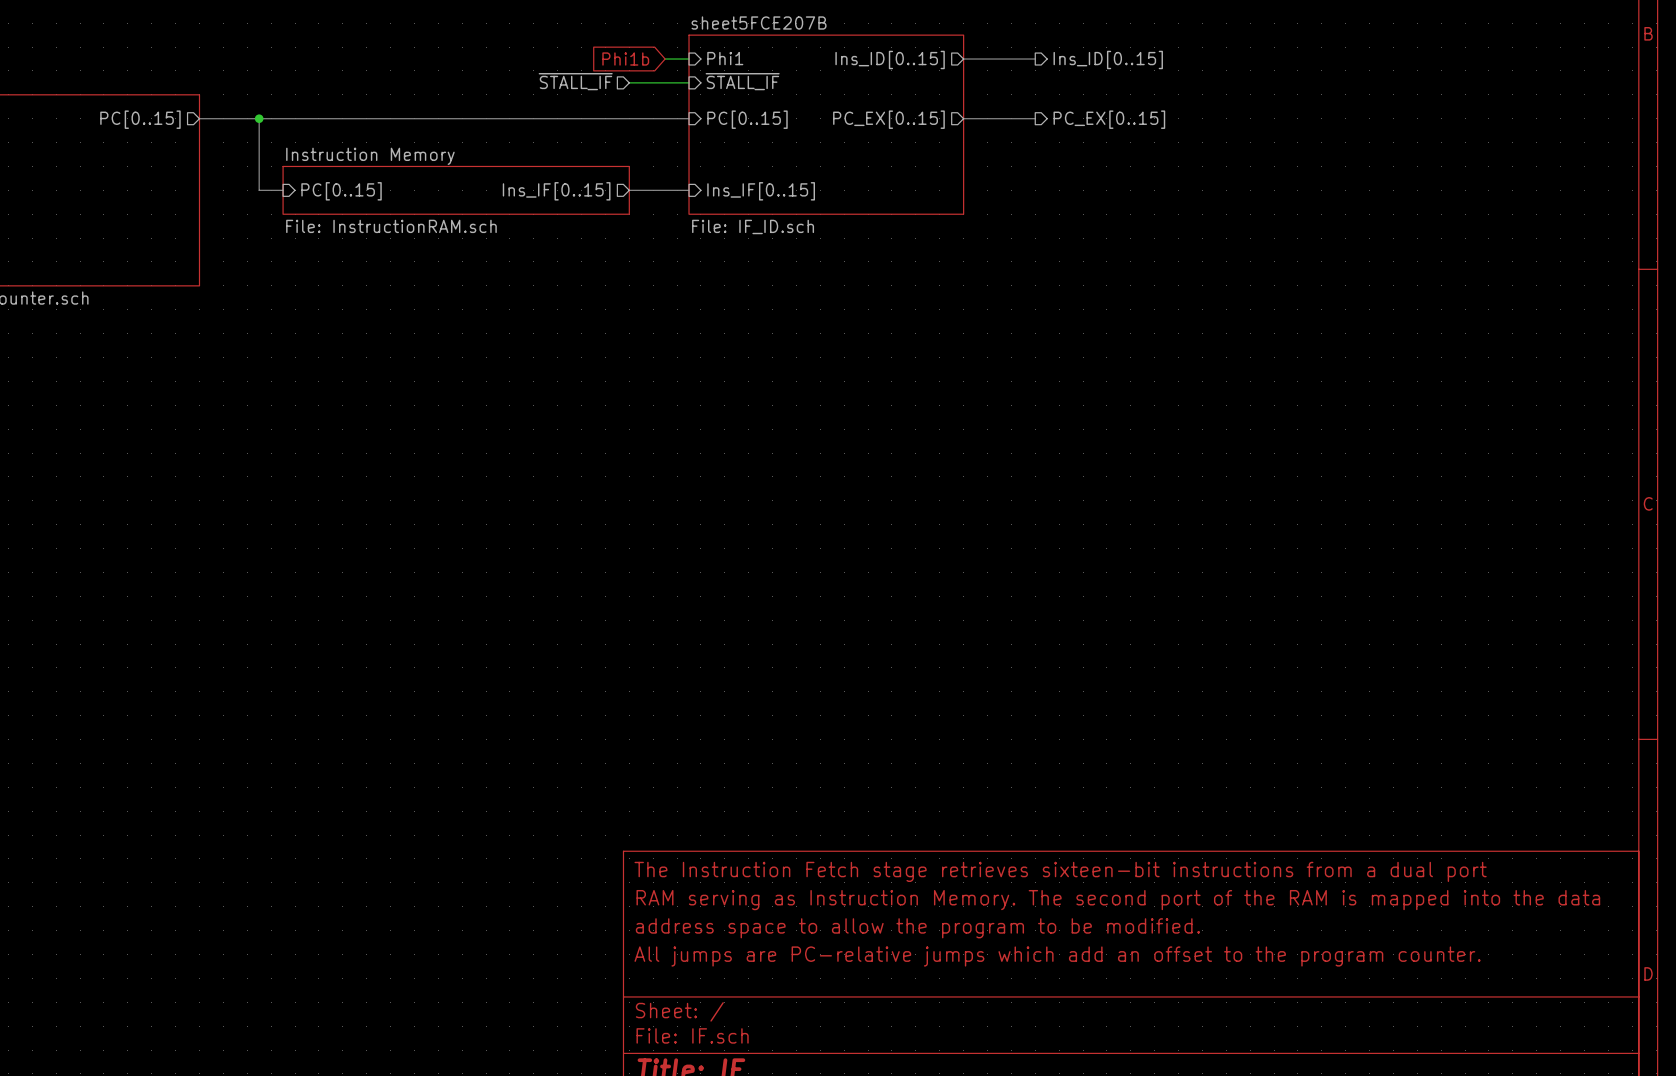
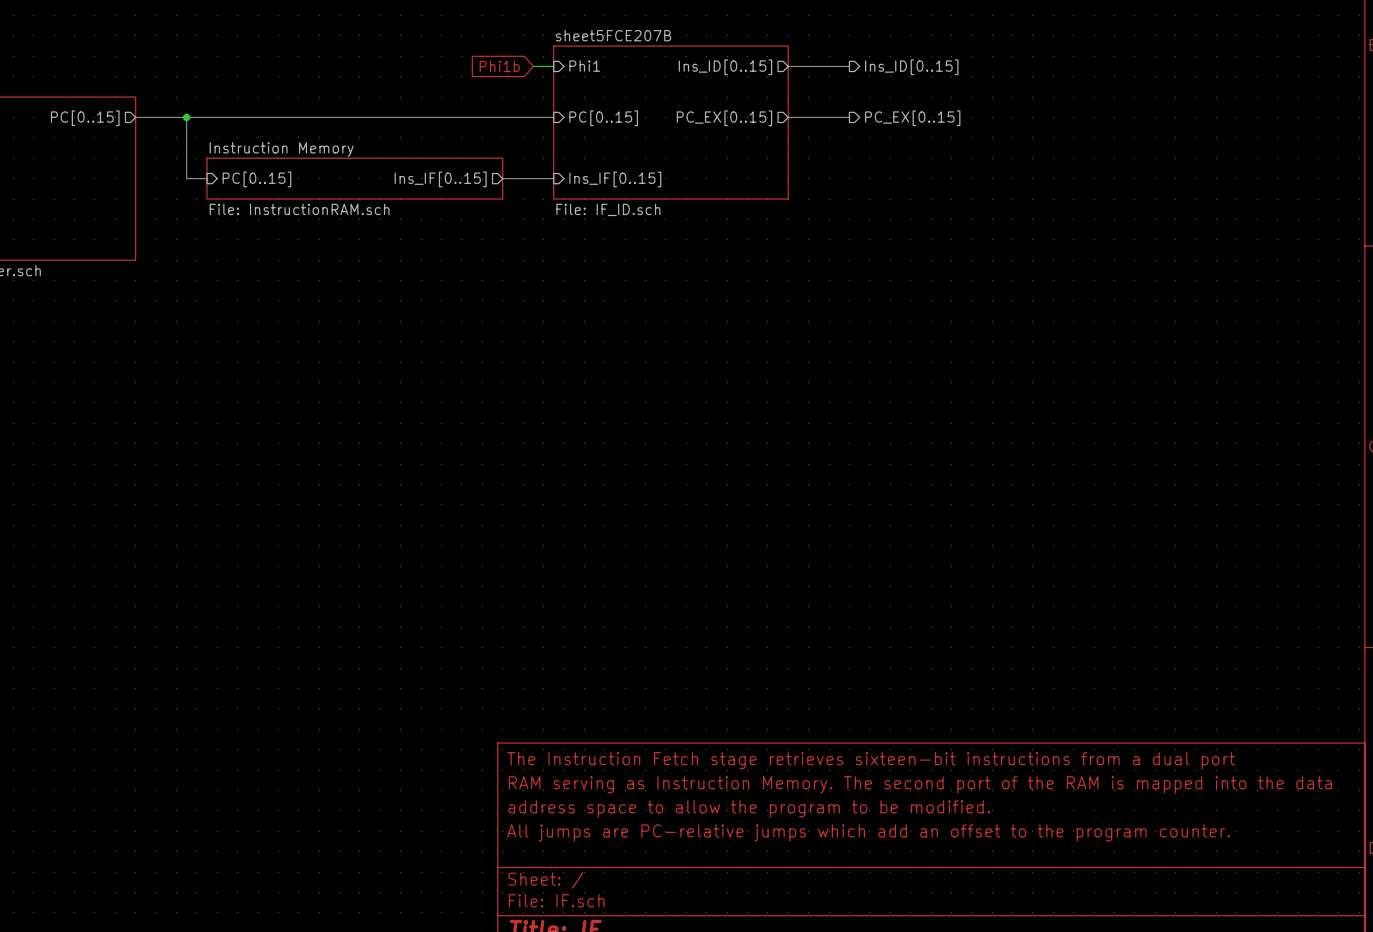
hierarchical label: ~{STALL_IF} (575, 81) -> none
sheet pin: ~{STALL_IF} (742, 81) -> none
wire: (629, 82) (689, 82) -> none

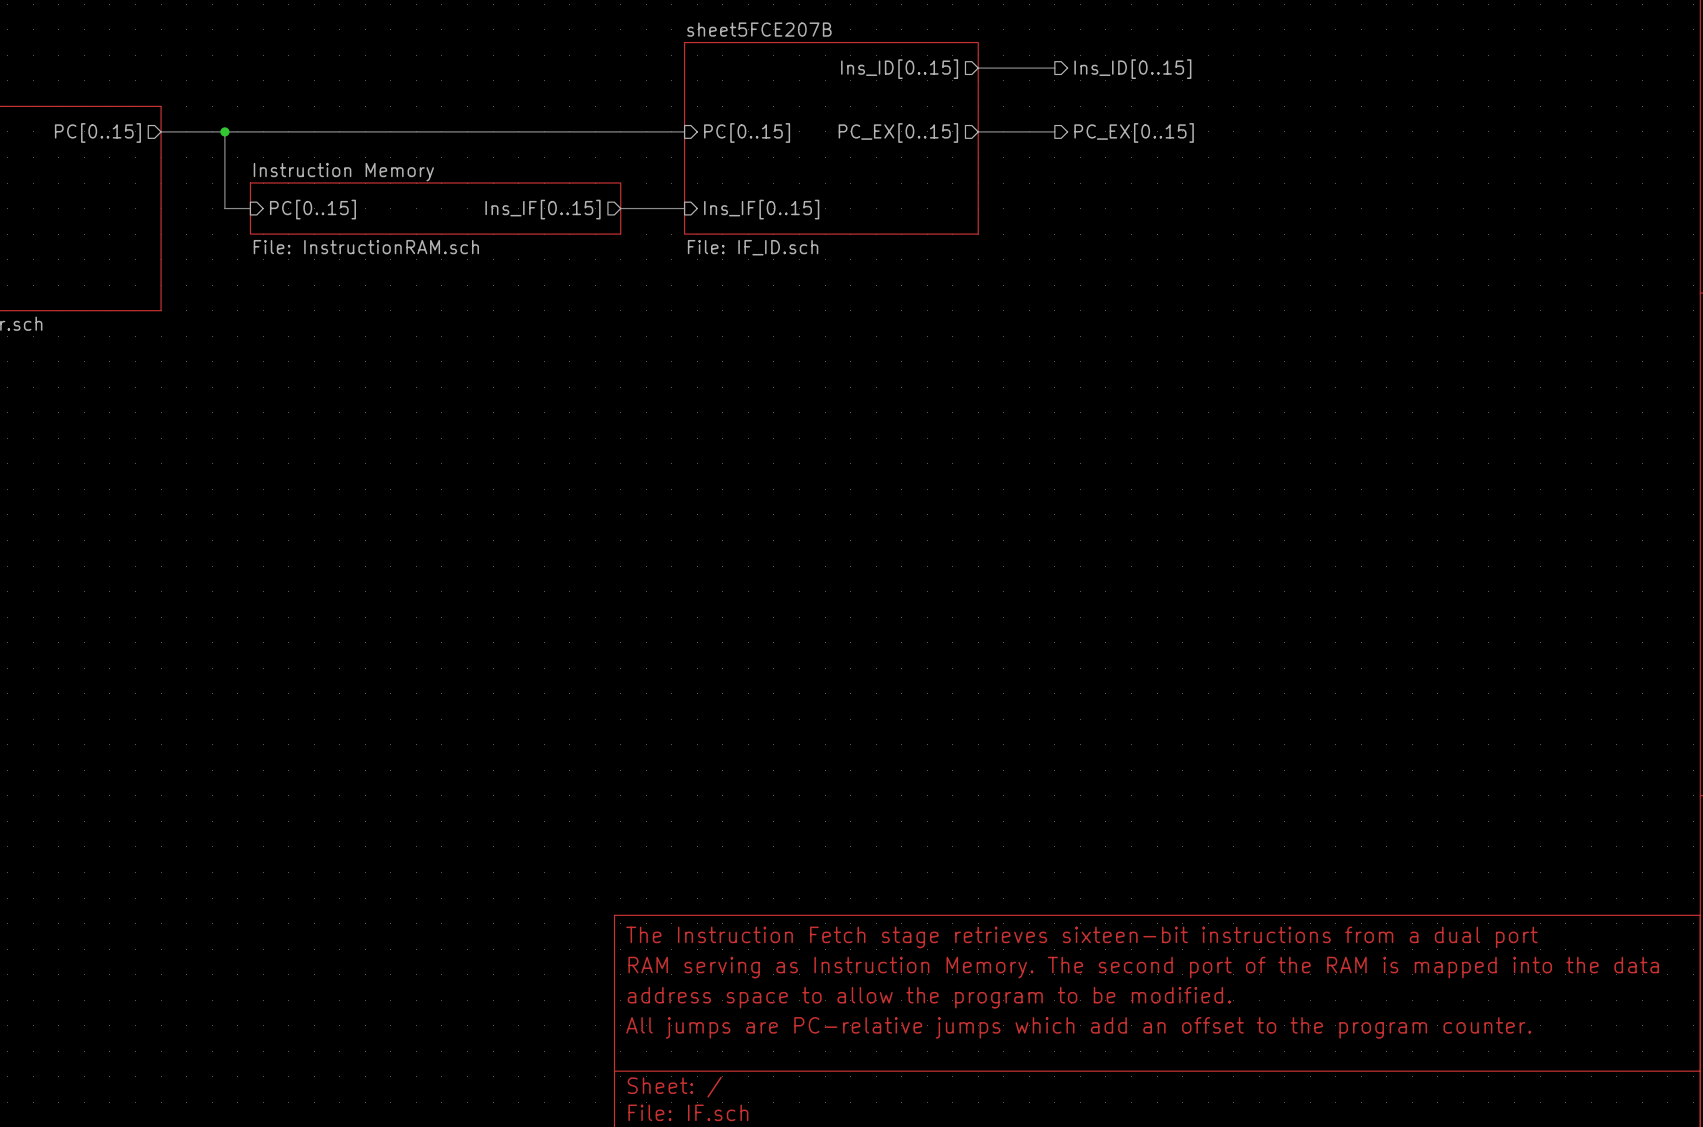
global label: Phi1b (499, 66) -> none
wire: (533, 66) (553, 66) -> none
sheet pin: Phi1 (584, 66) -> none

